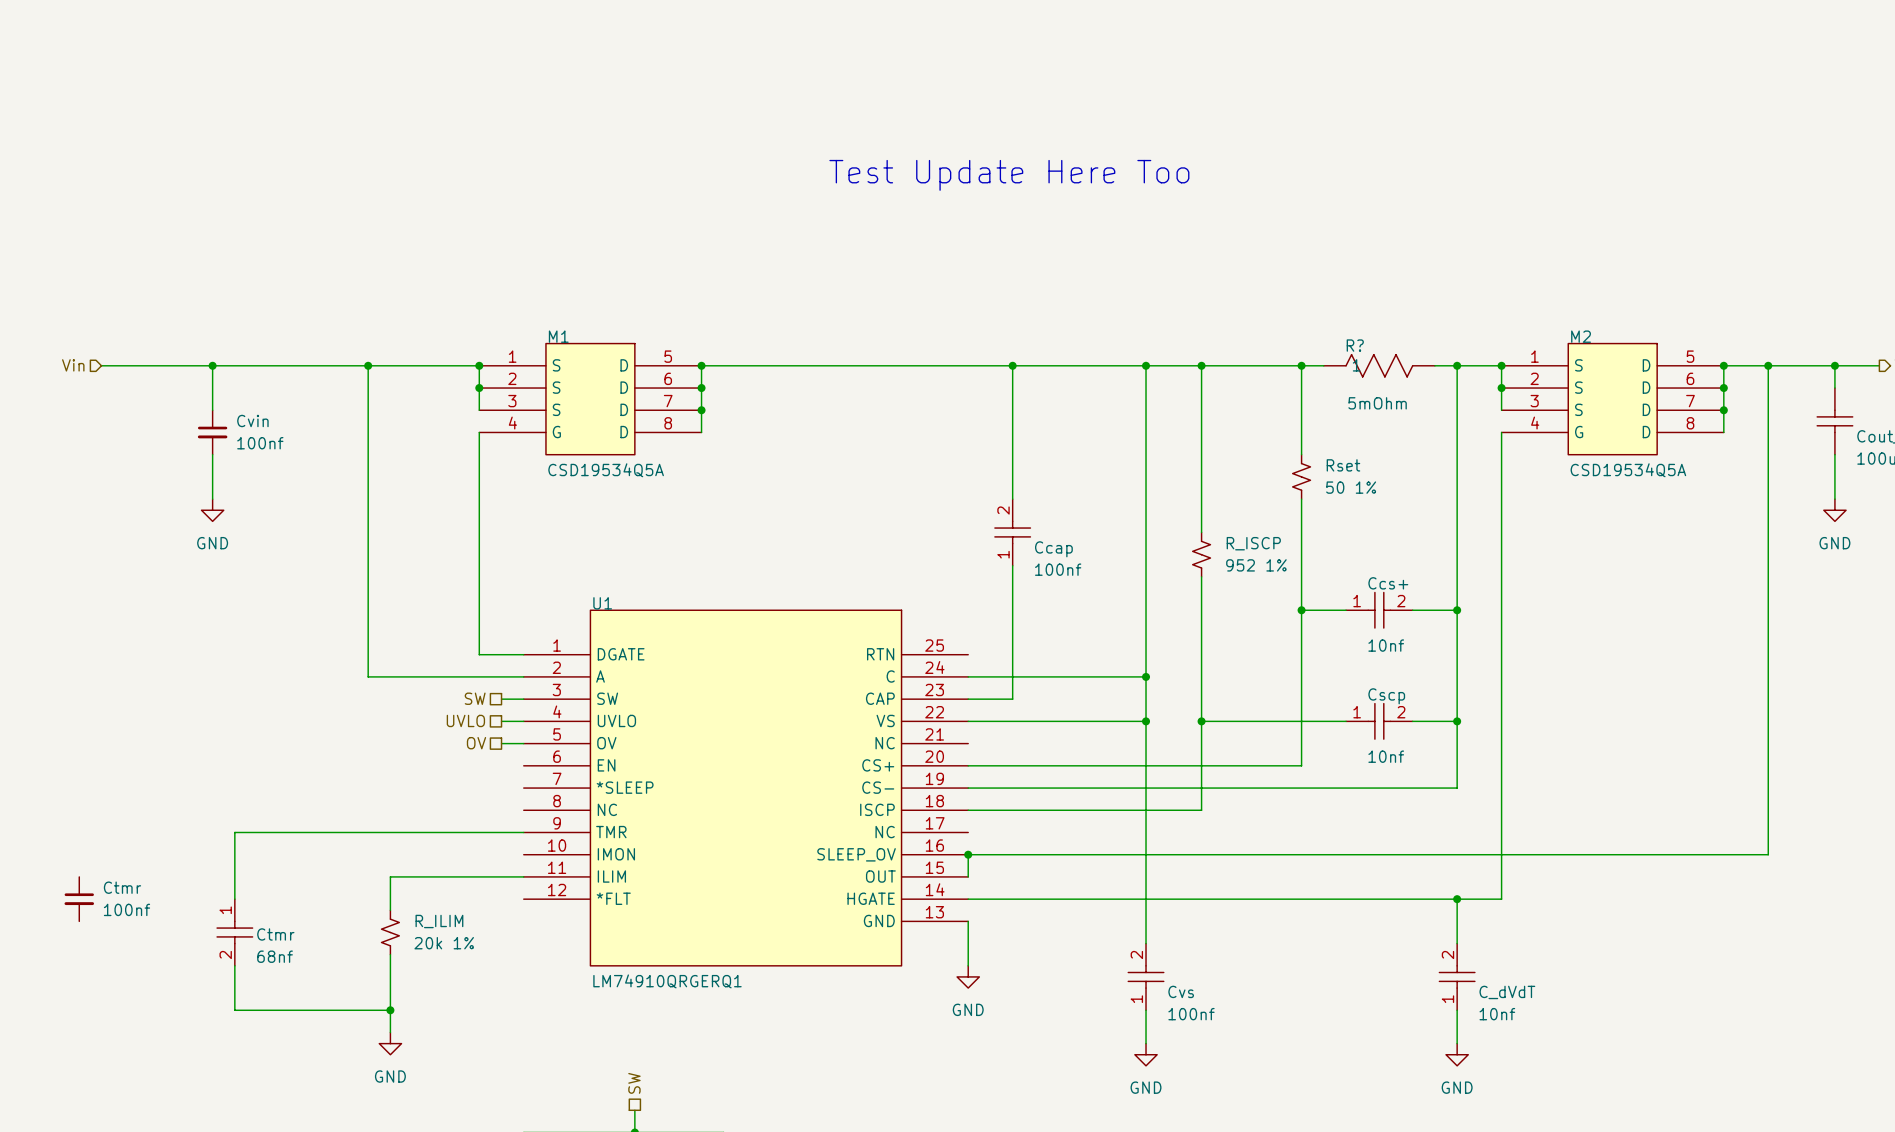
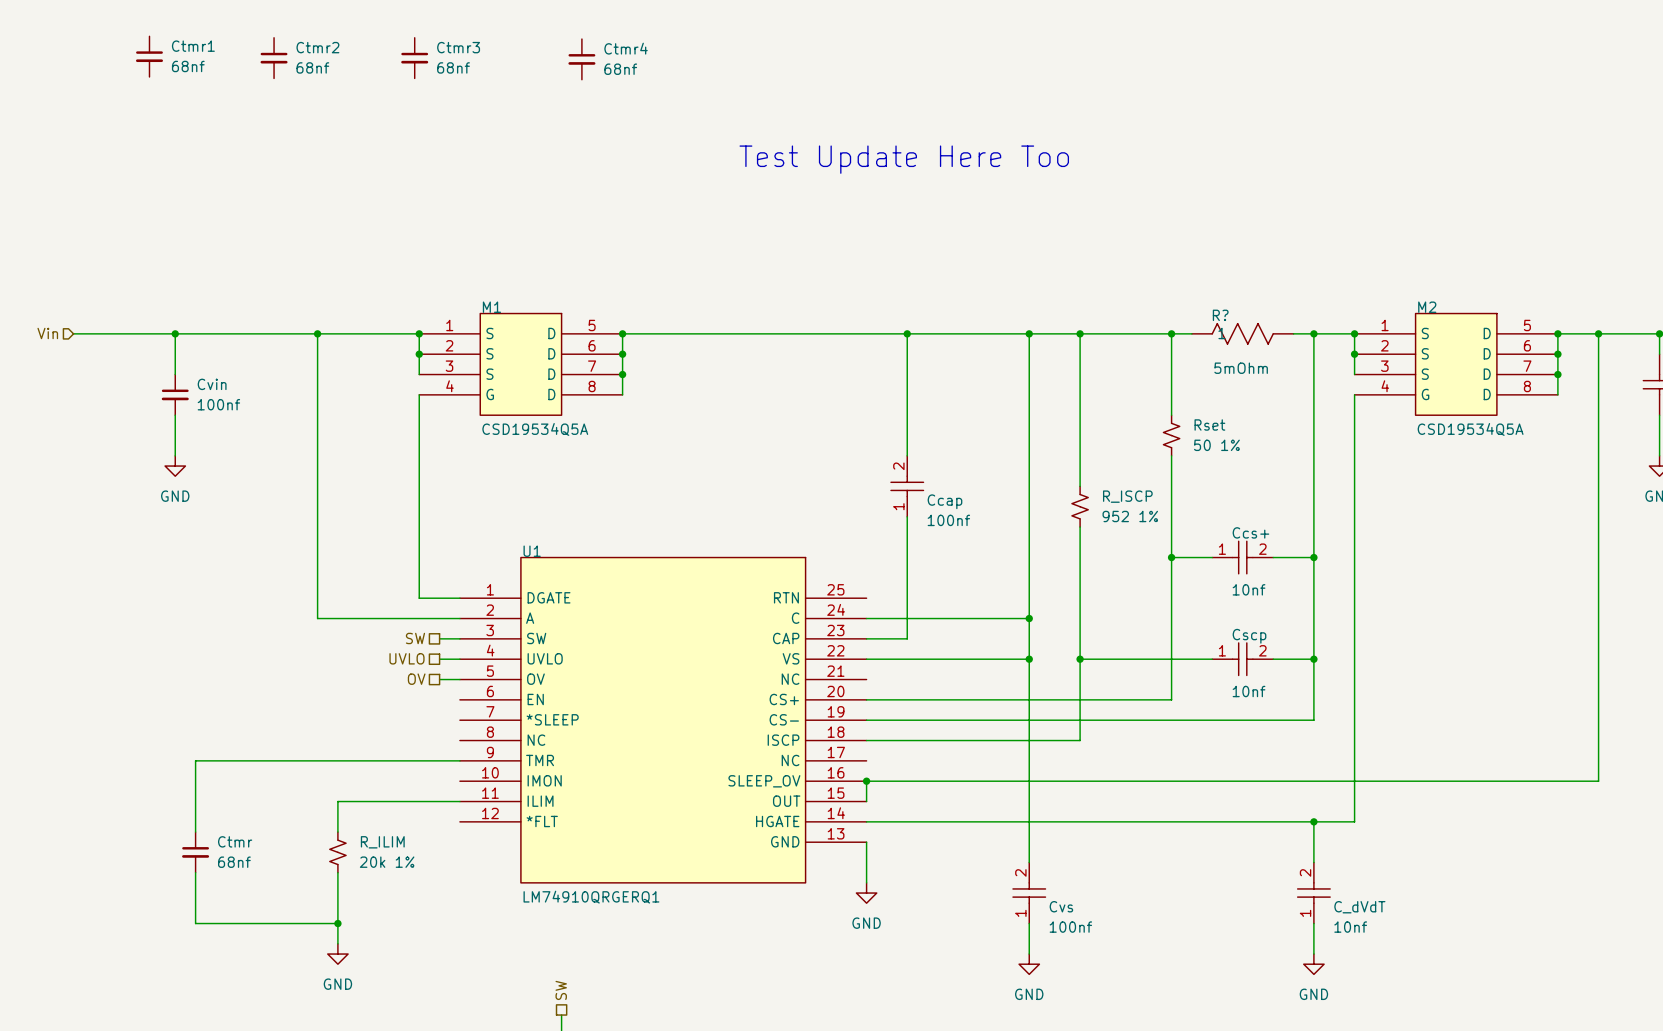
Ctmr1: none -> 68nf (149, 56)
Ctmr2: none -> 68nf (274, 58)
Ctmr3: none -> 68nf (414, 58)
Ctmr4: none -> 68nf (581, 59)
Ctmr: 100nf (79, 899) -> none
Ctmr symbol: [217, 899, 253, 966] -> [182, 832, 210, 873]
Ctmr value: none -> 68nf (234, 862)
Ctmr text: 68nf (275, 956) -> none

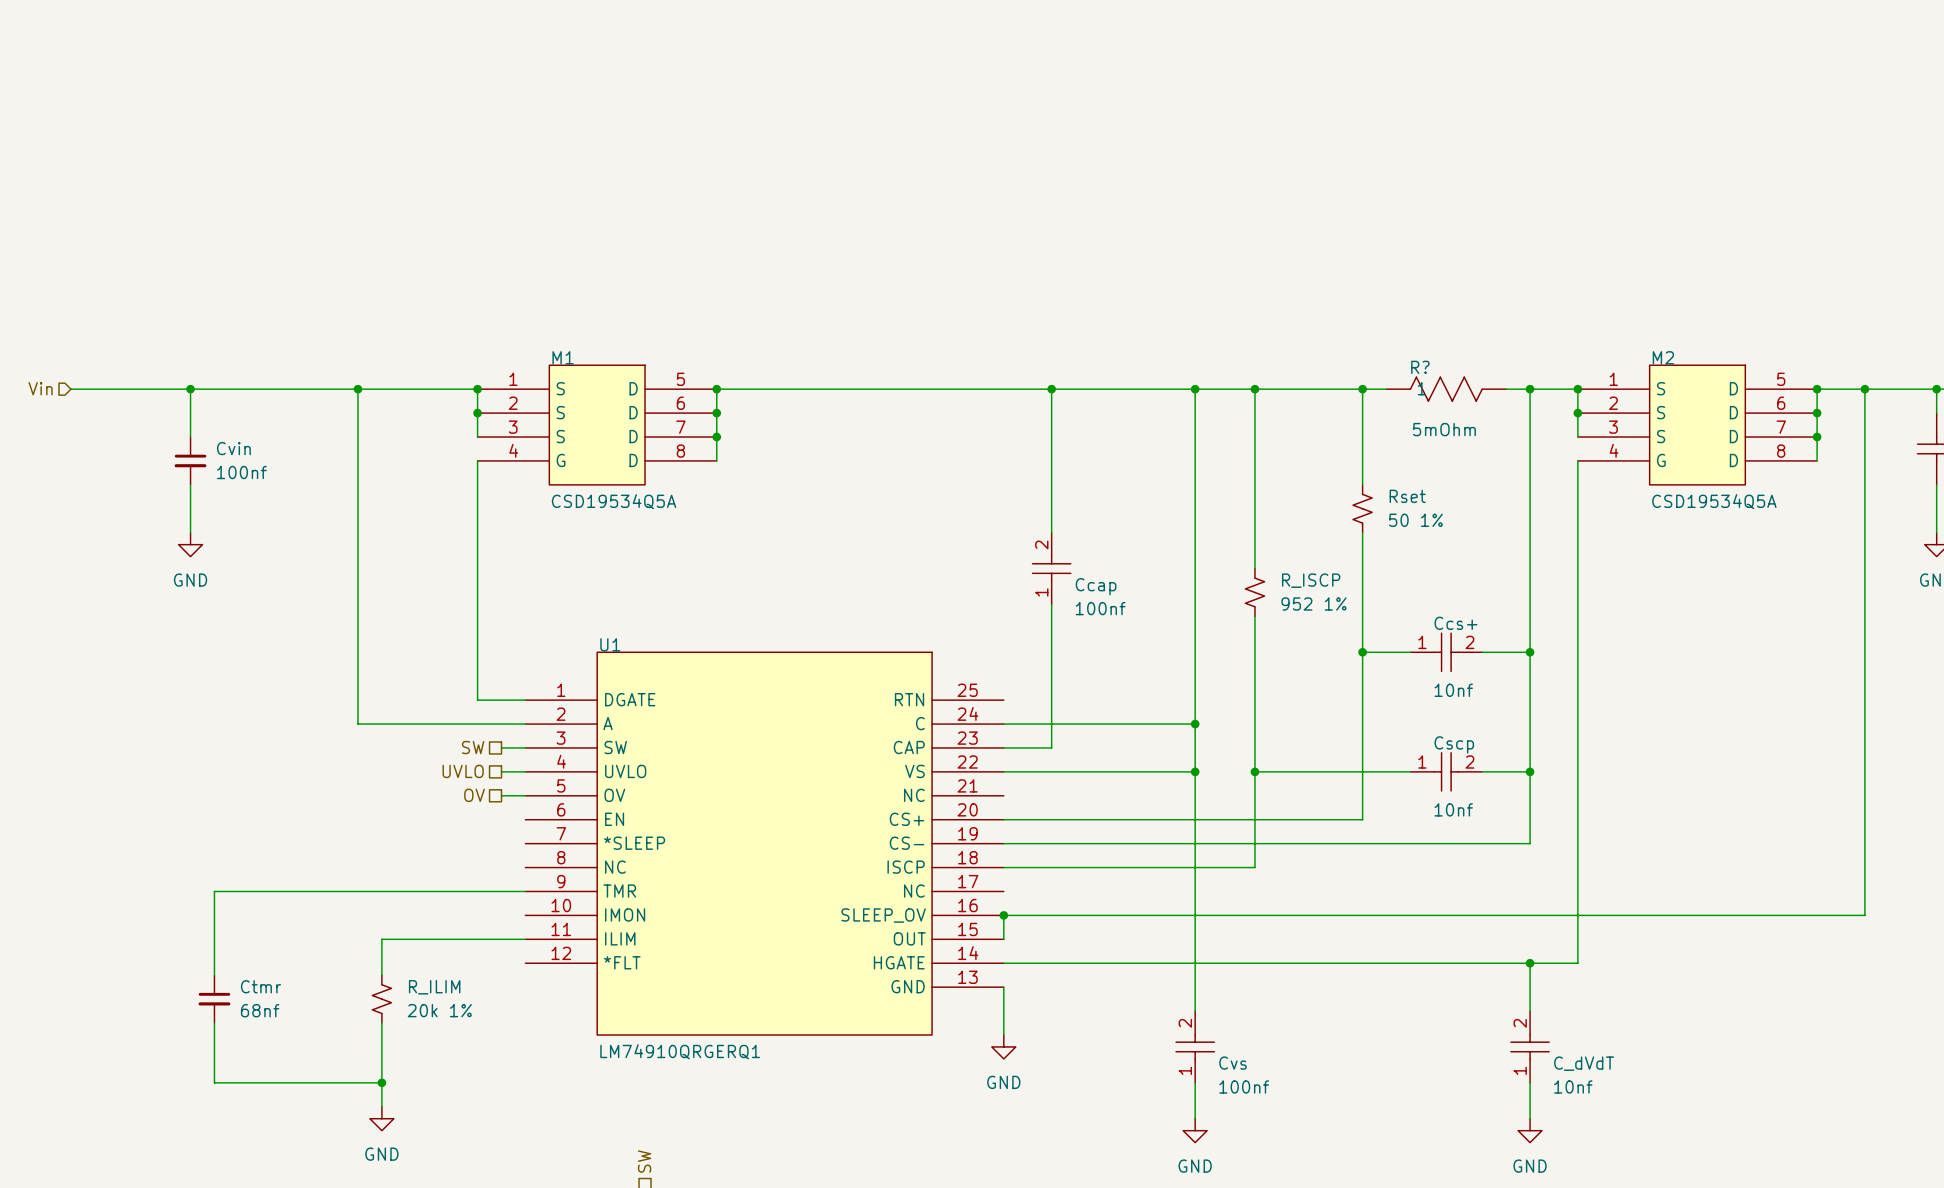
Ctmr1: 68nf (149, 56) -> none
Ctmr2: 68nf (274, 58) -> none
Ctmr3: 68nf (414, 58) -> none
Ctmr4: 68nf (581, 59) -> none
text: Test Update Here Too (904, 159) -> none

